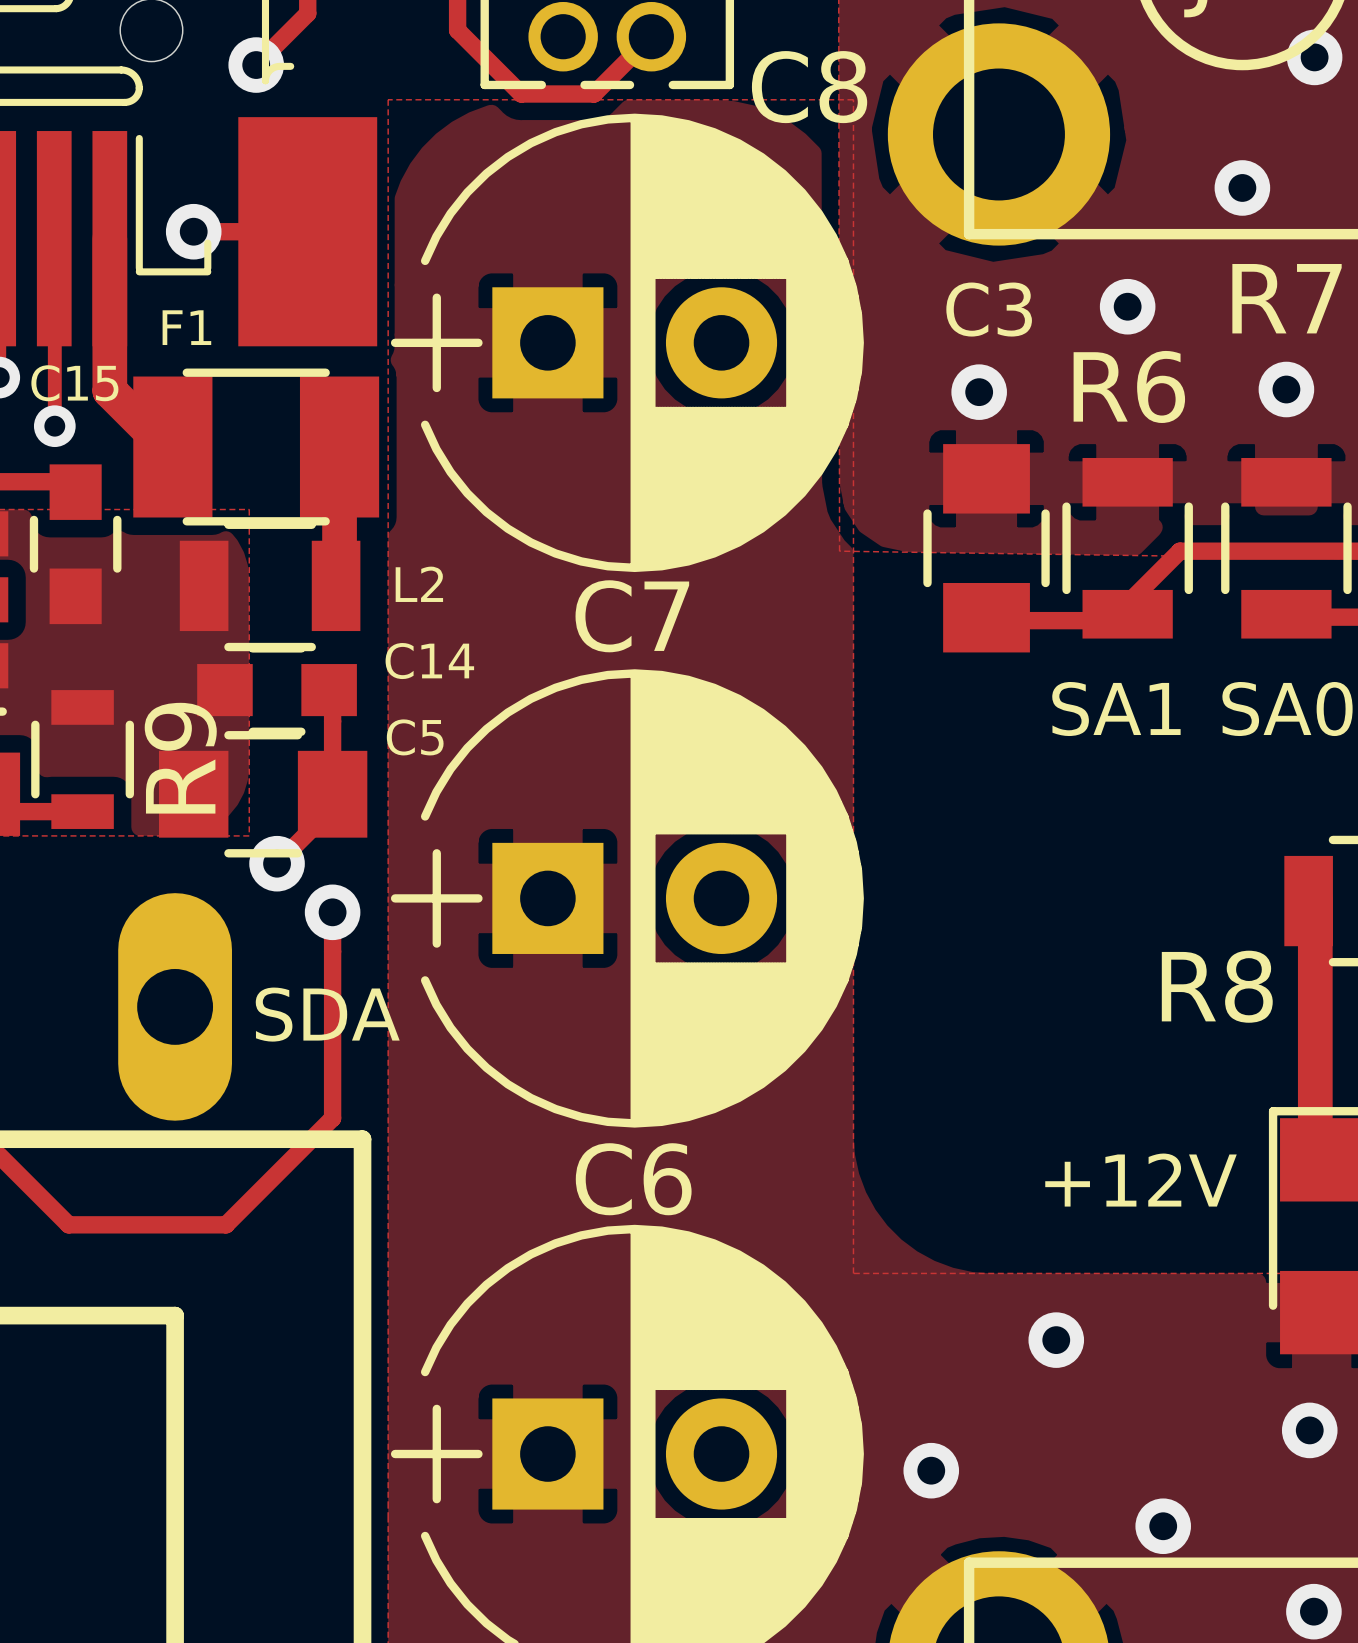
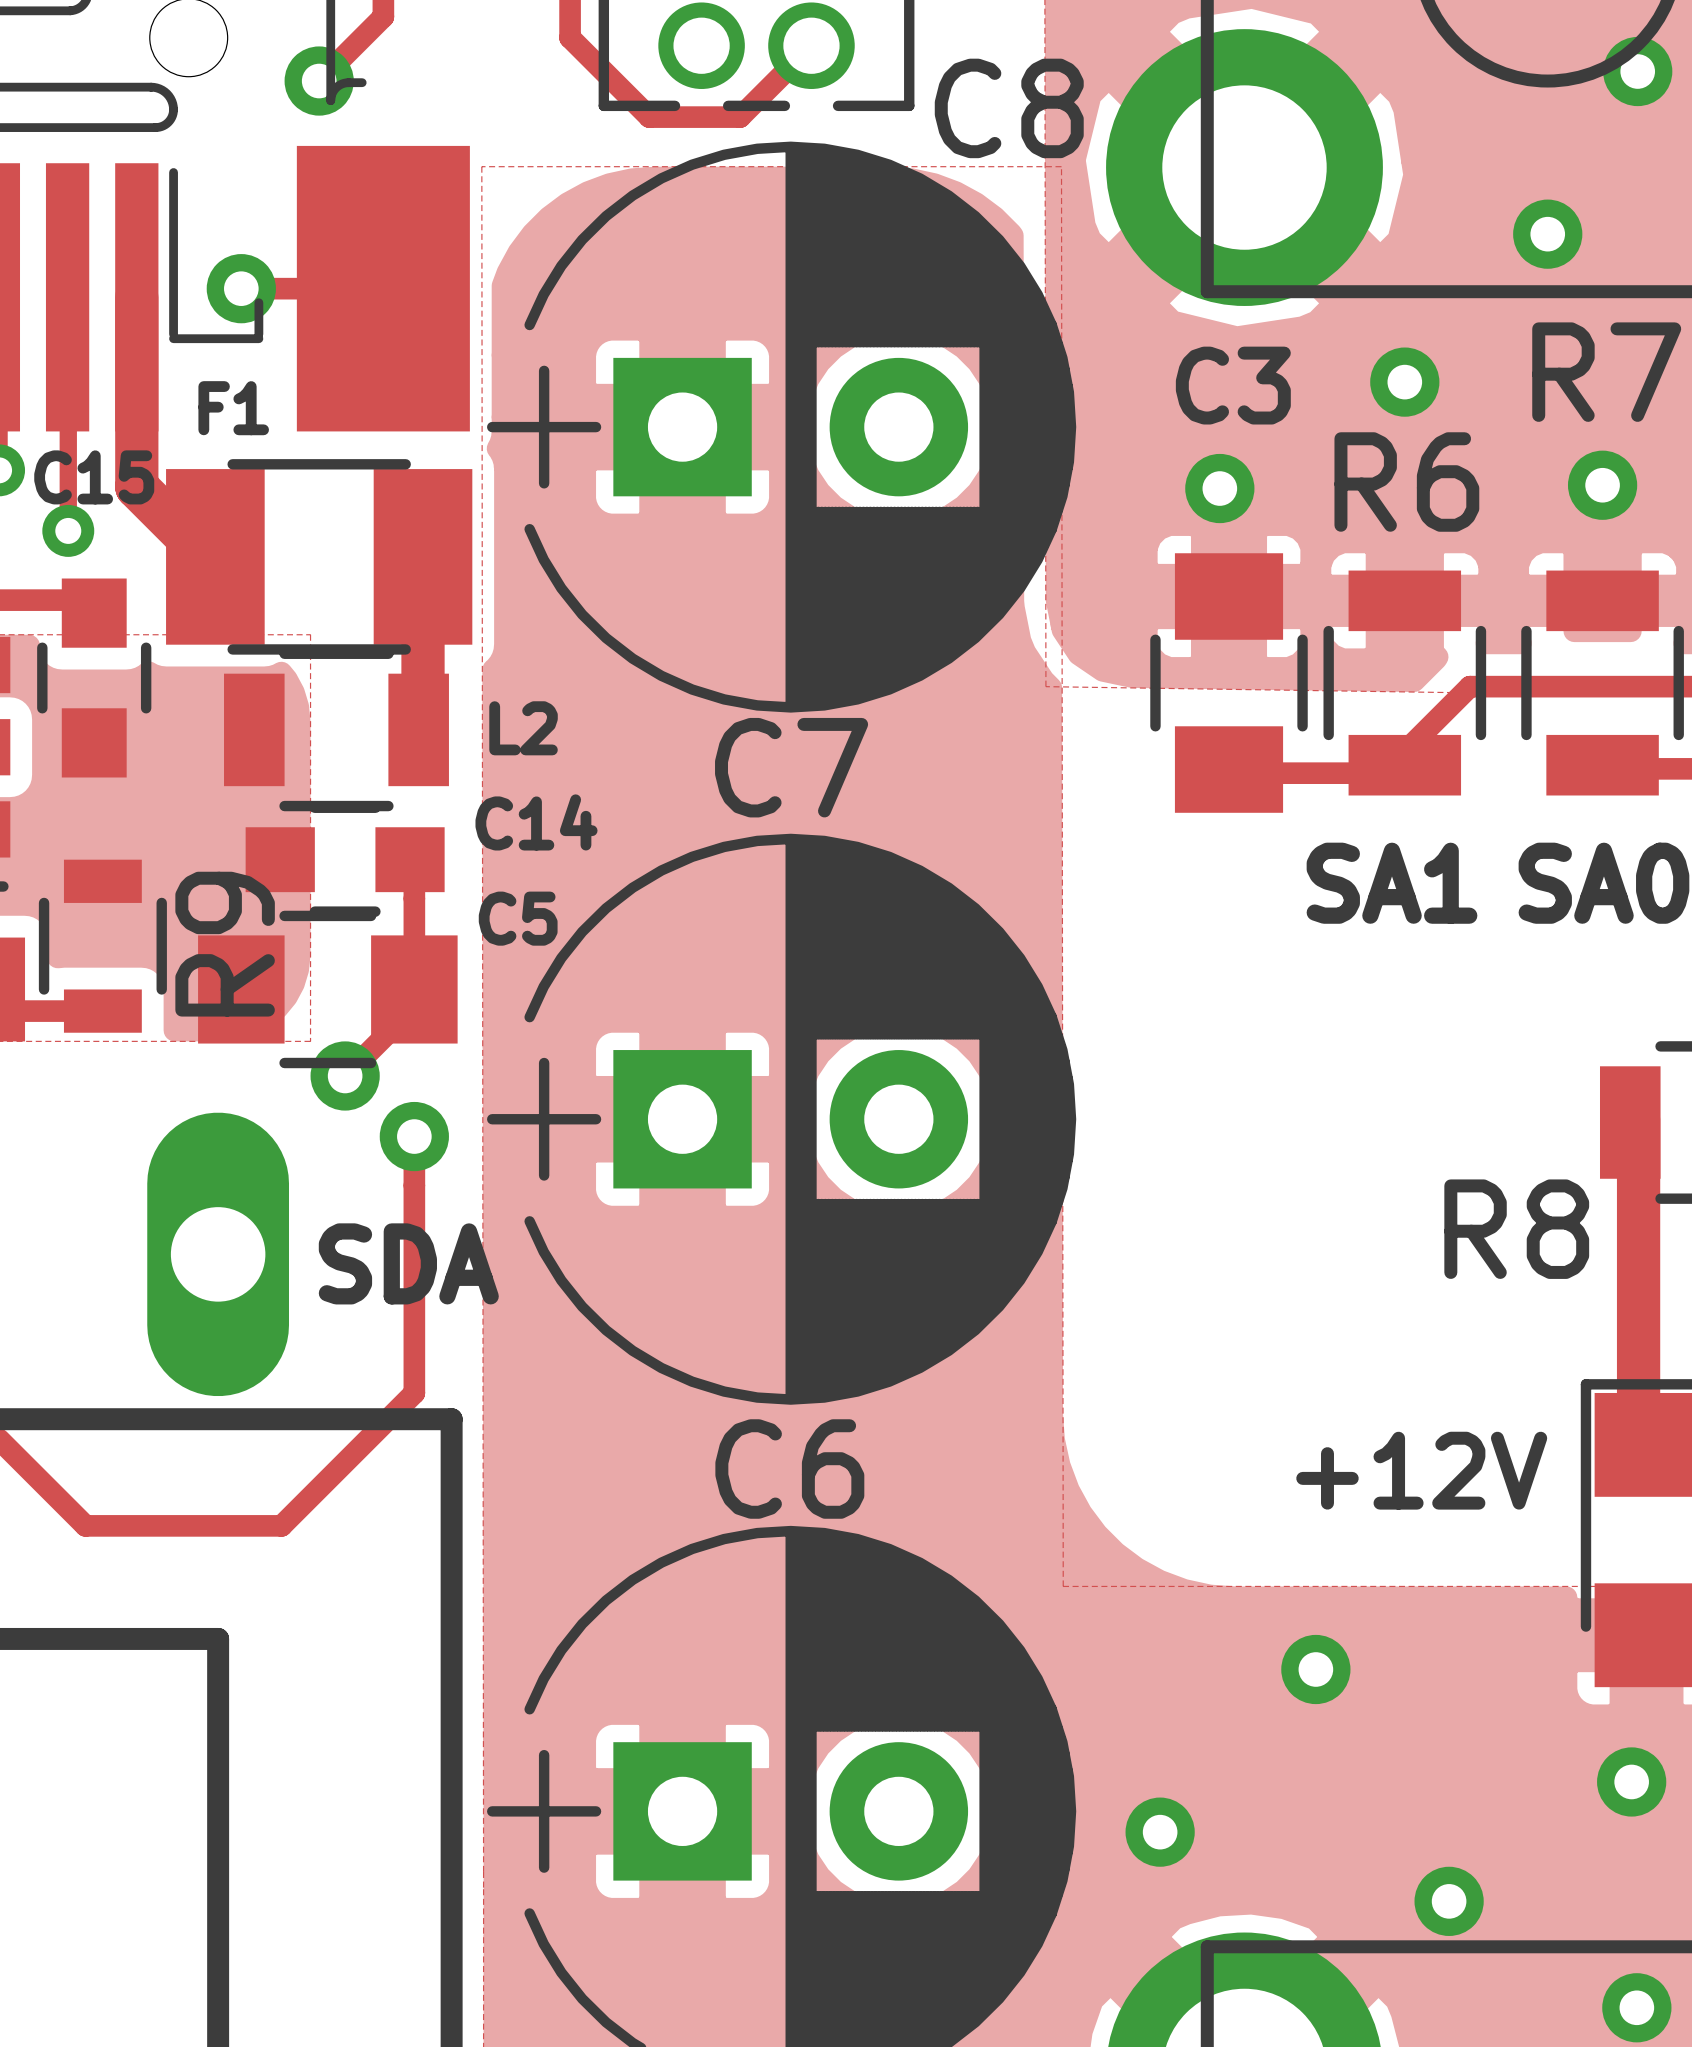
zone outline: (853, 1273) (853, 99) (388, 99) (388, 1502) -> (1063, 1586) (1061, 166) (481, 166) (483, 1871)

